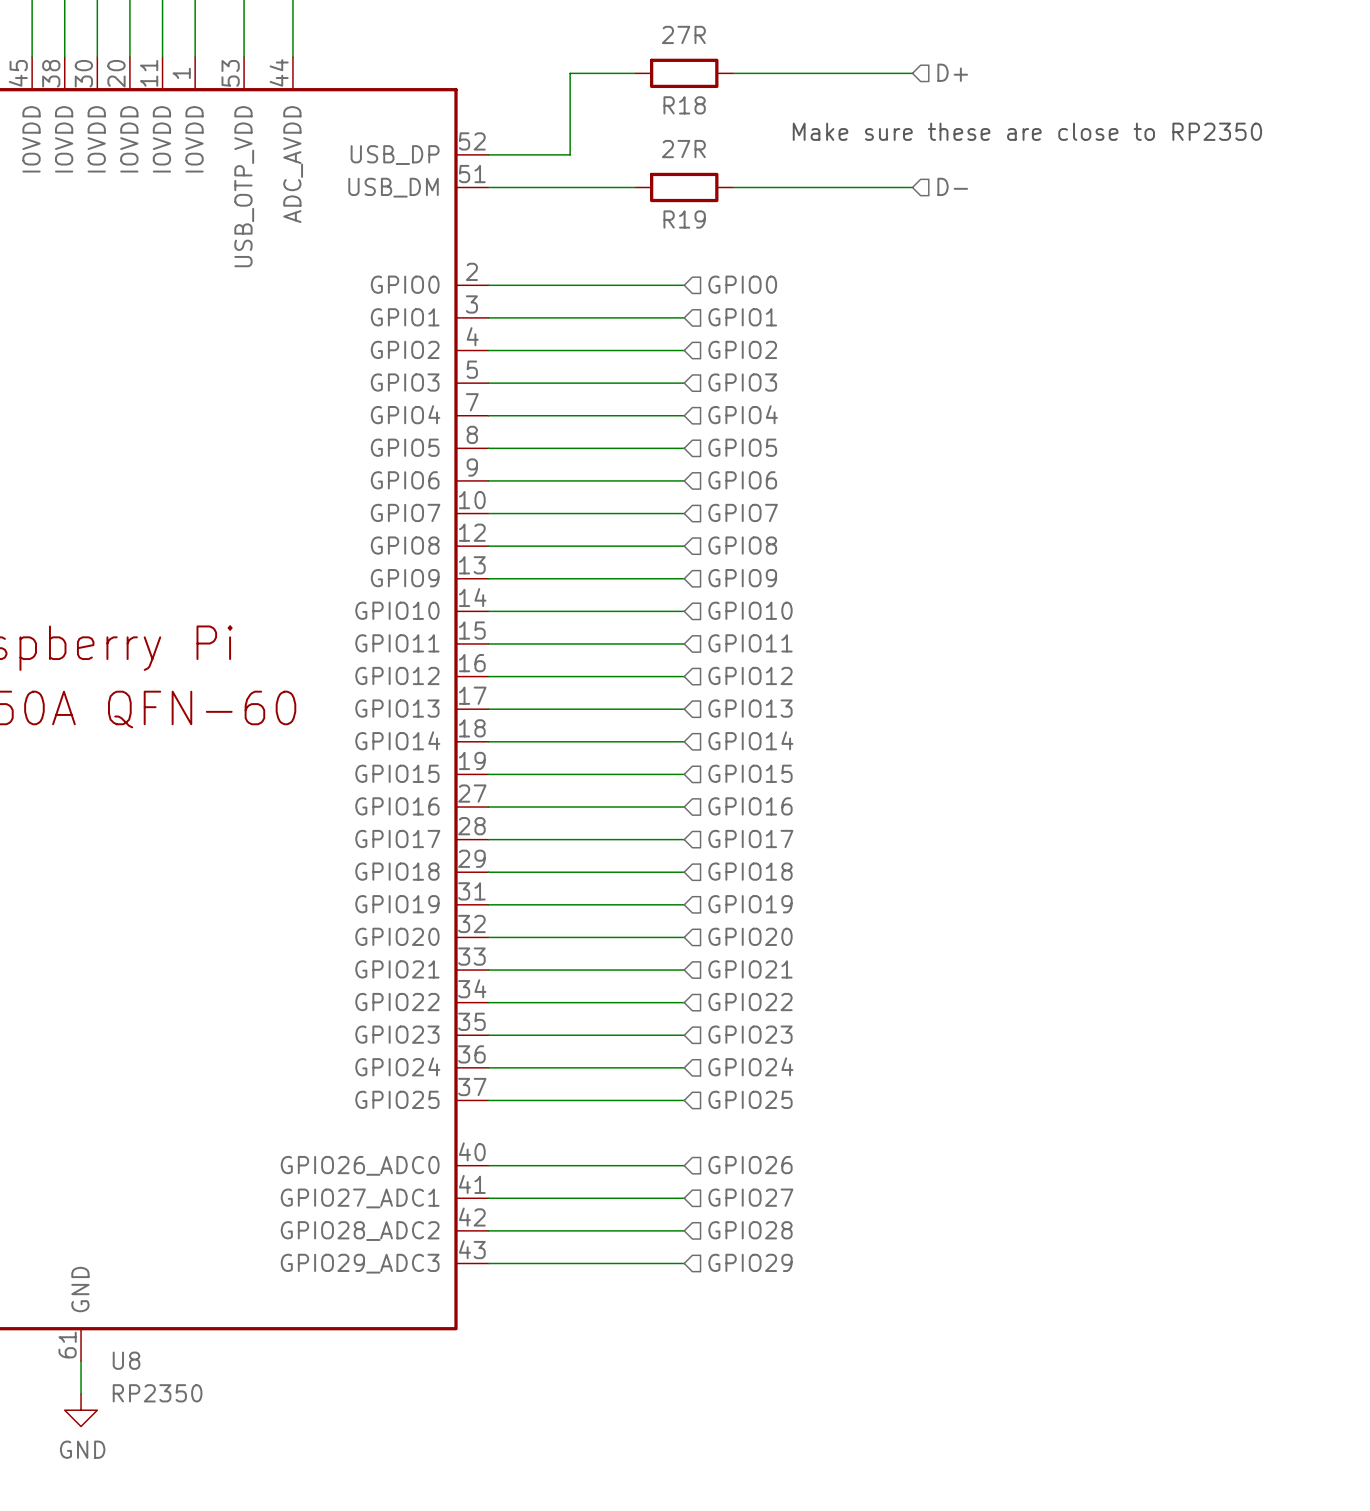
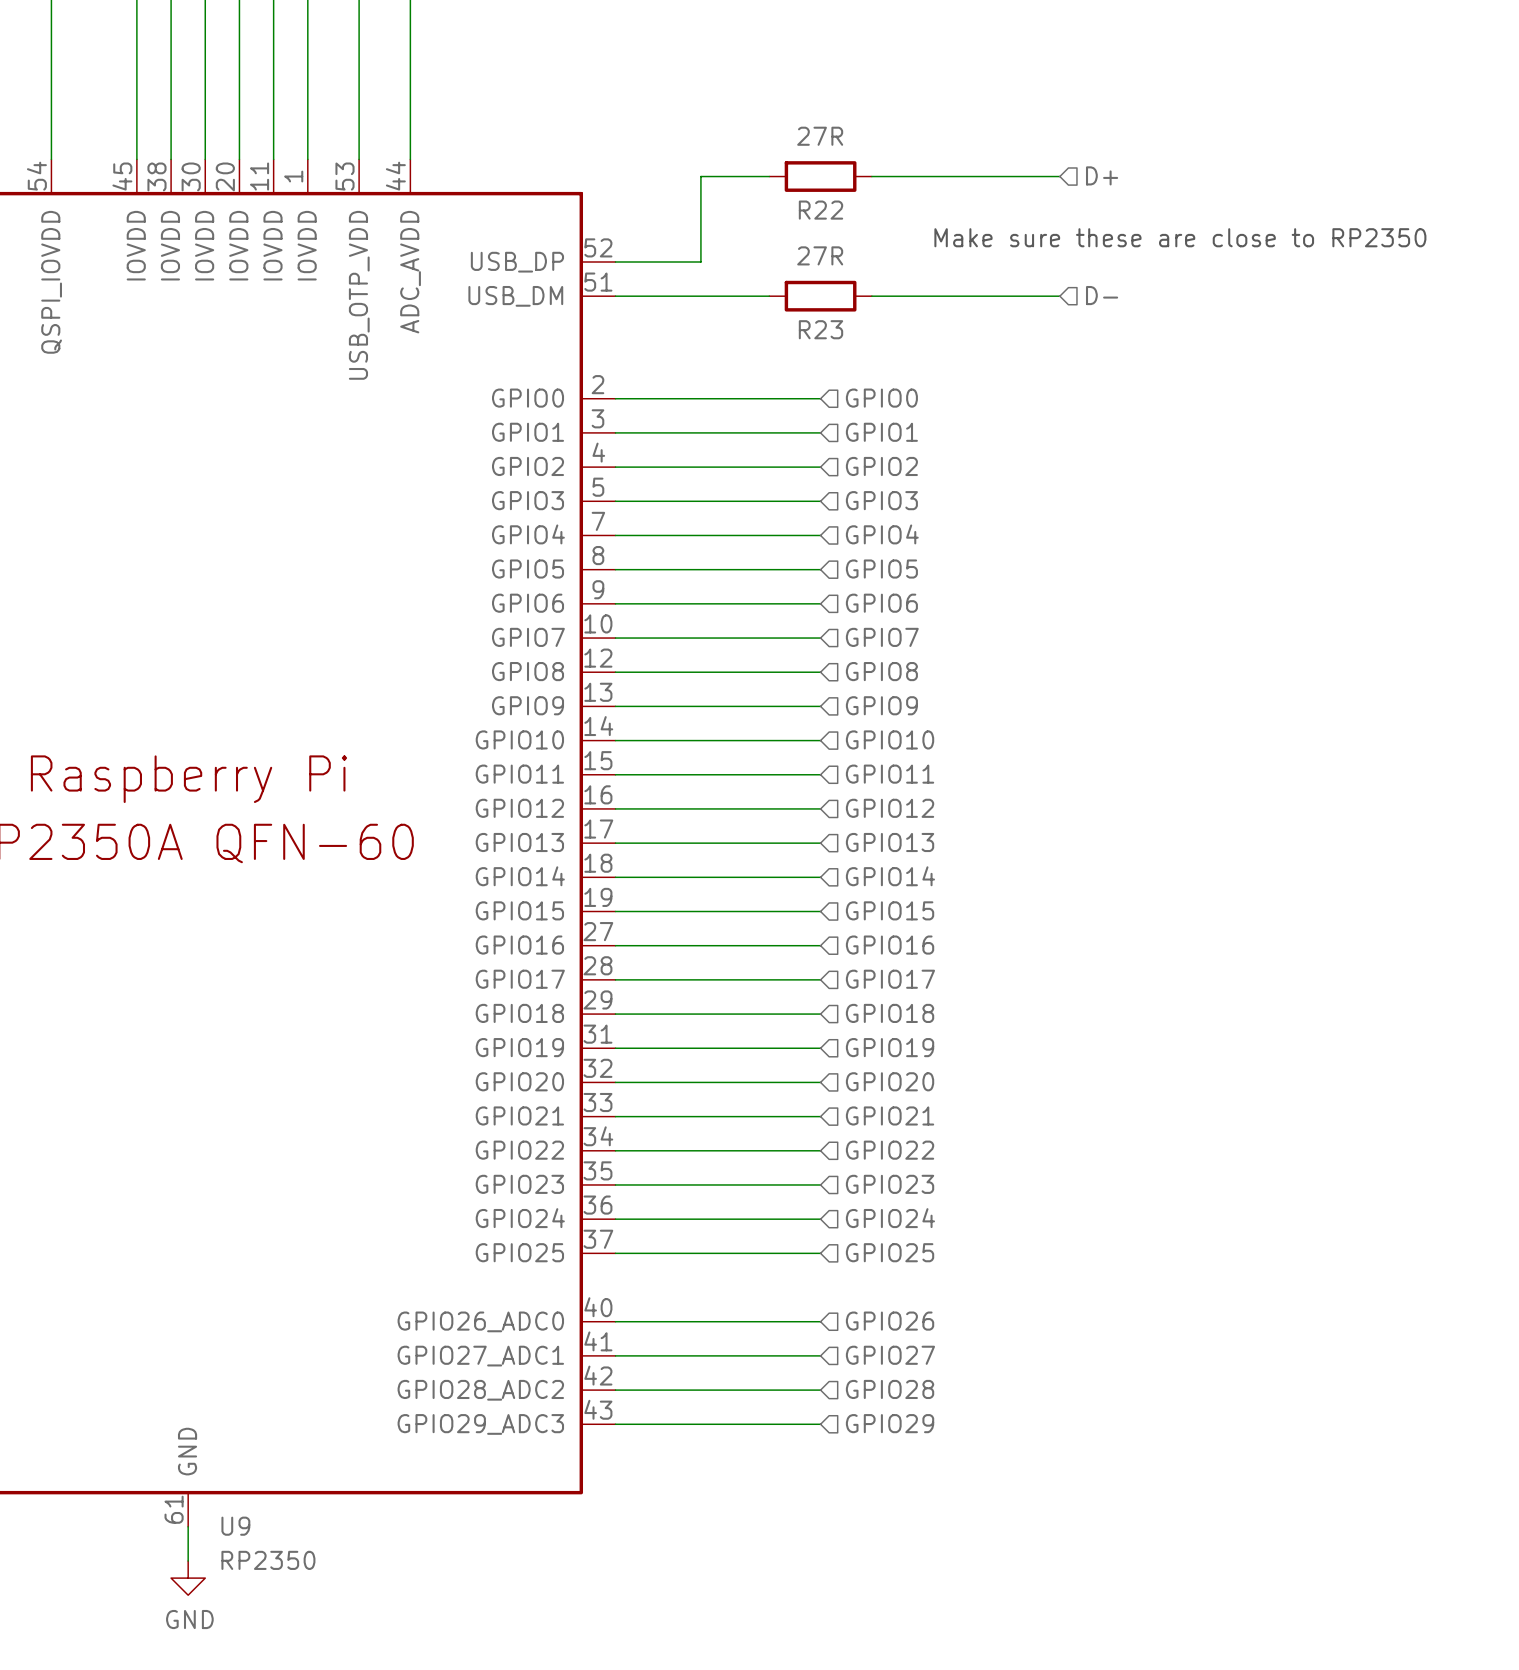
R18 name: R18 (684, 105) -> R22 (820, 210)
R19 name: R19 (684, 219) -> R23 (820, 329)
U8 name: U8 (126, 1360) -> U9 (235, 1526)

